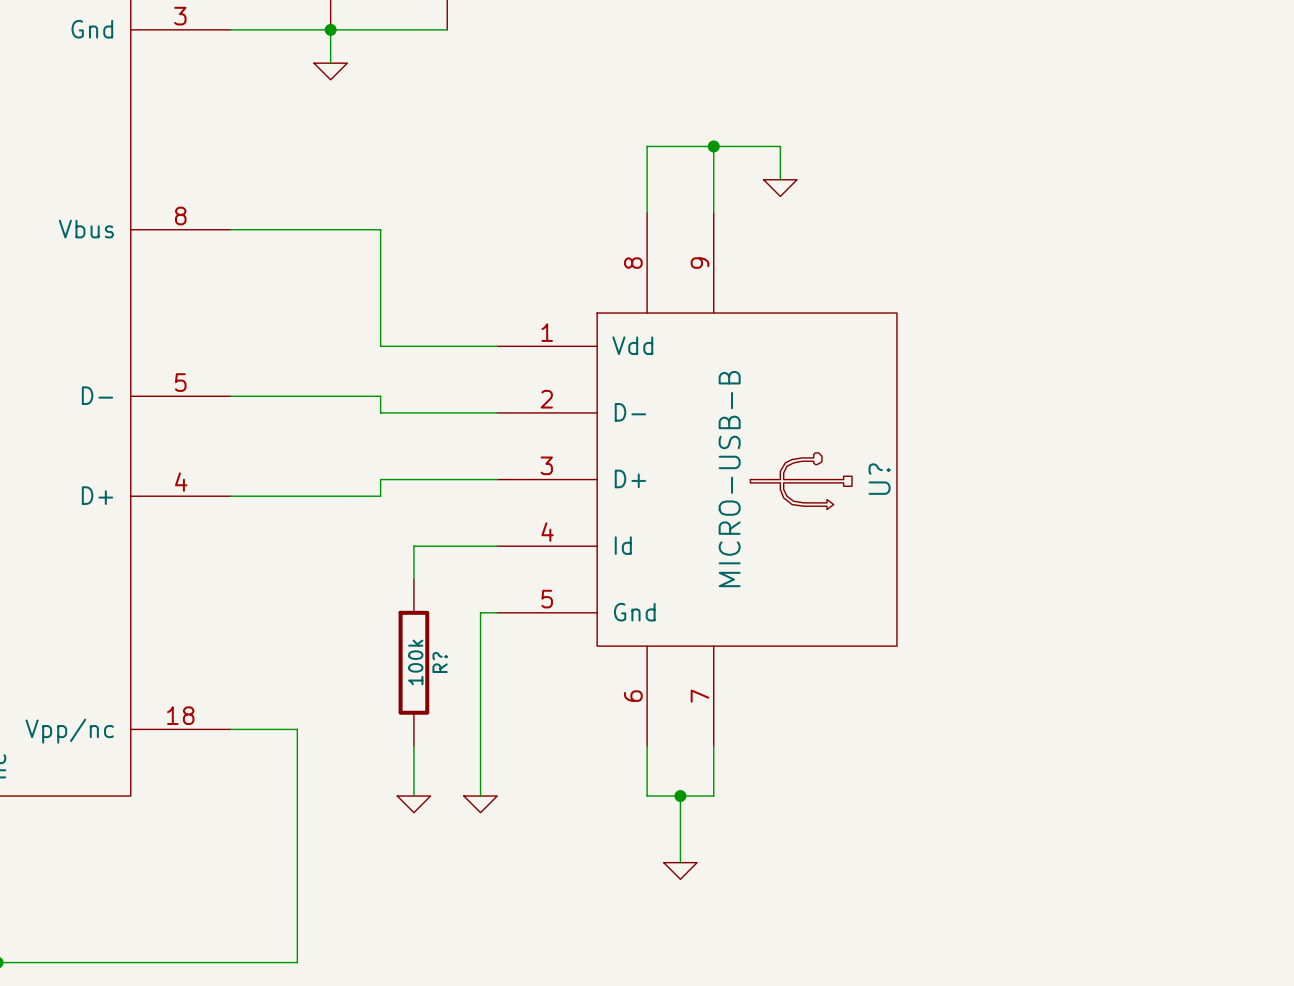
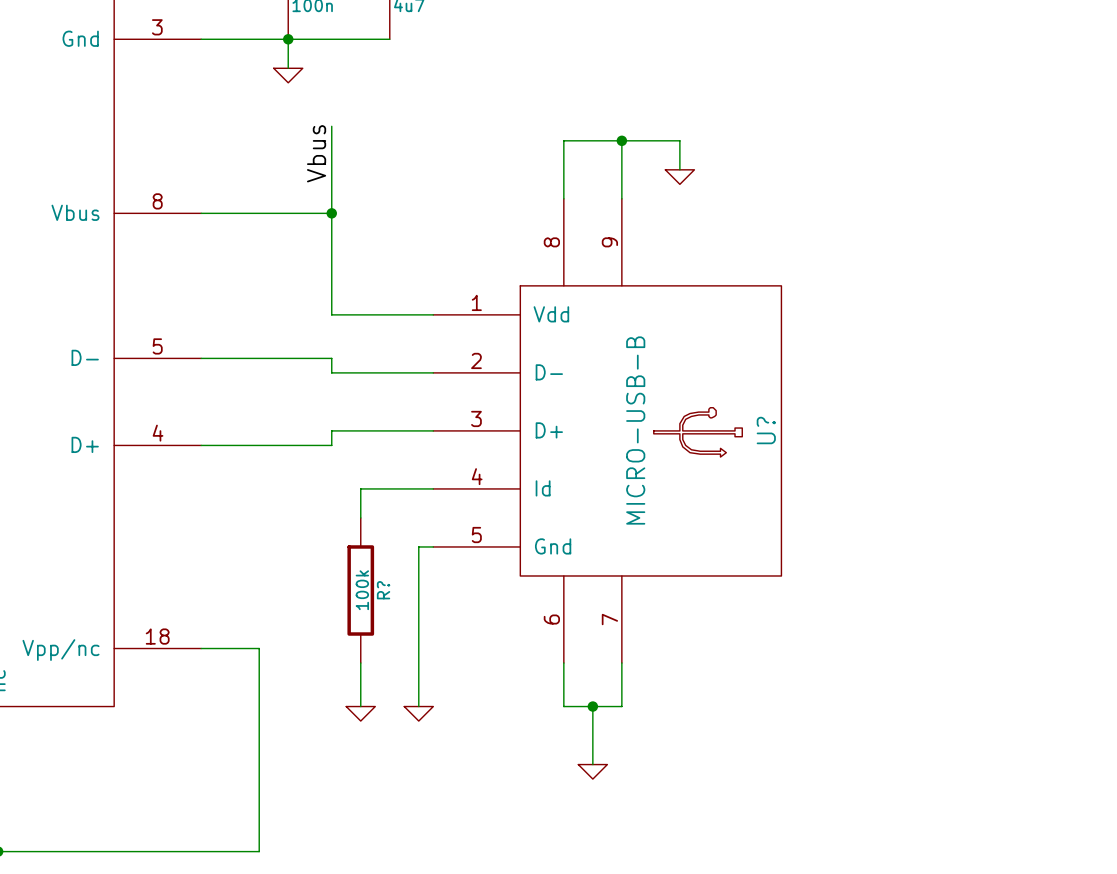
wire: none -> (331, 126) (331, 213)
label: none -> Vbus (316, 153)
junction: none -> (331, 213)

